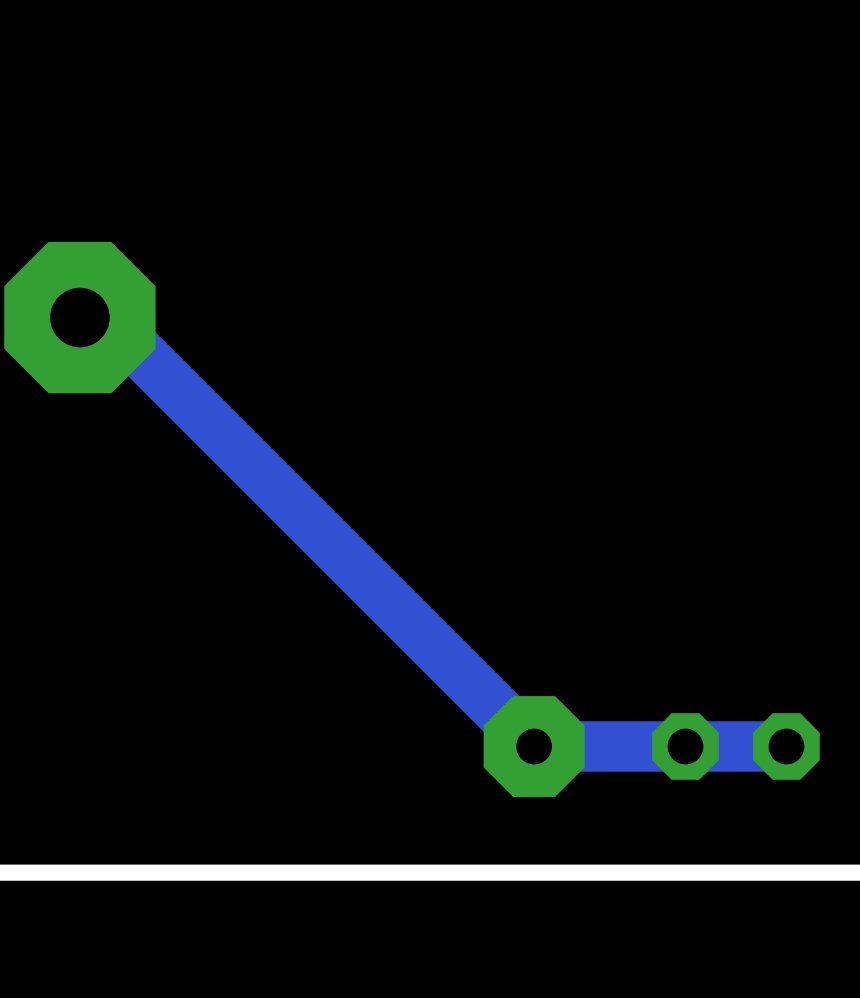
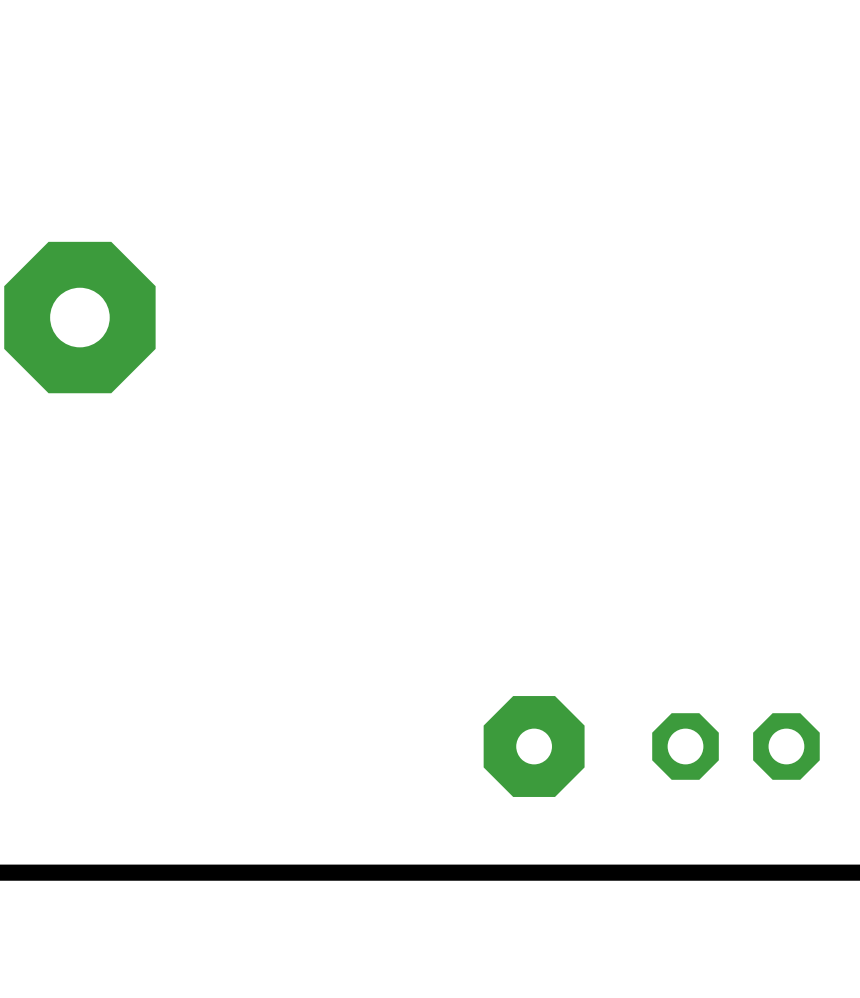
track: (79, 317) (105, 317) (534, 746) (786, 746) -> none

